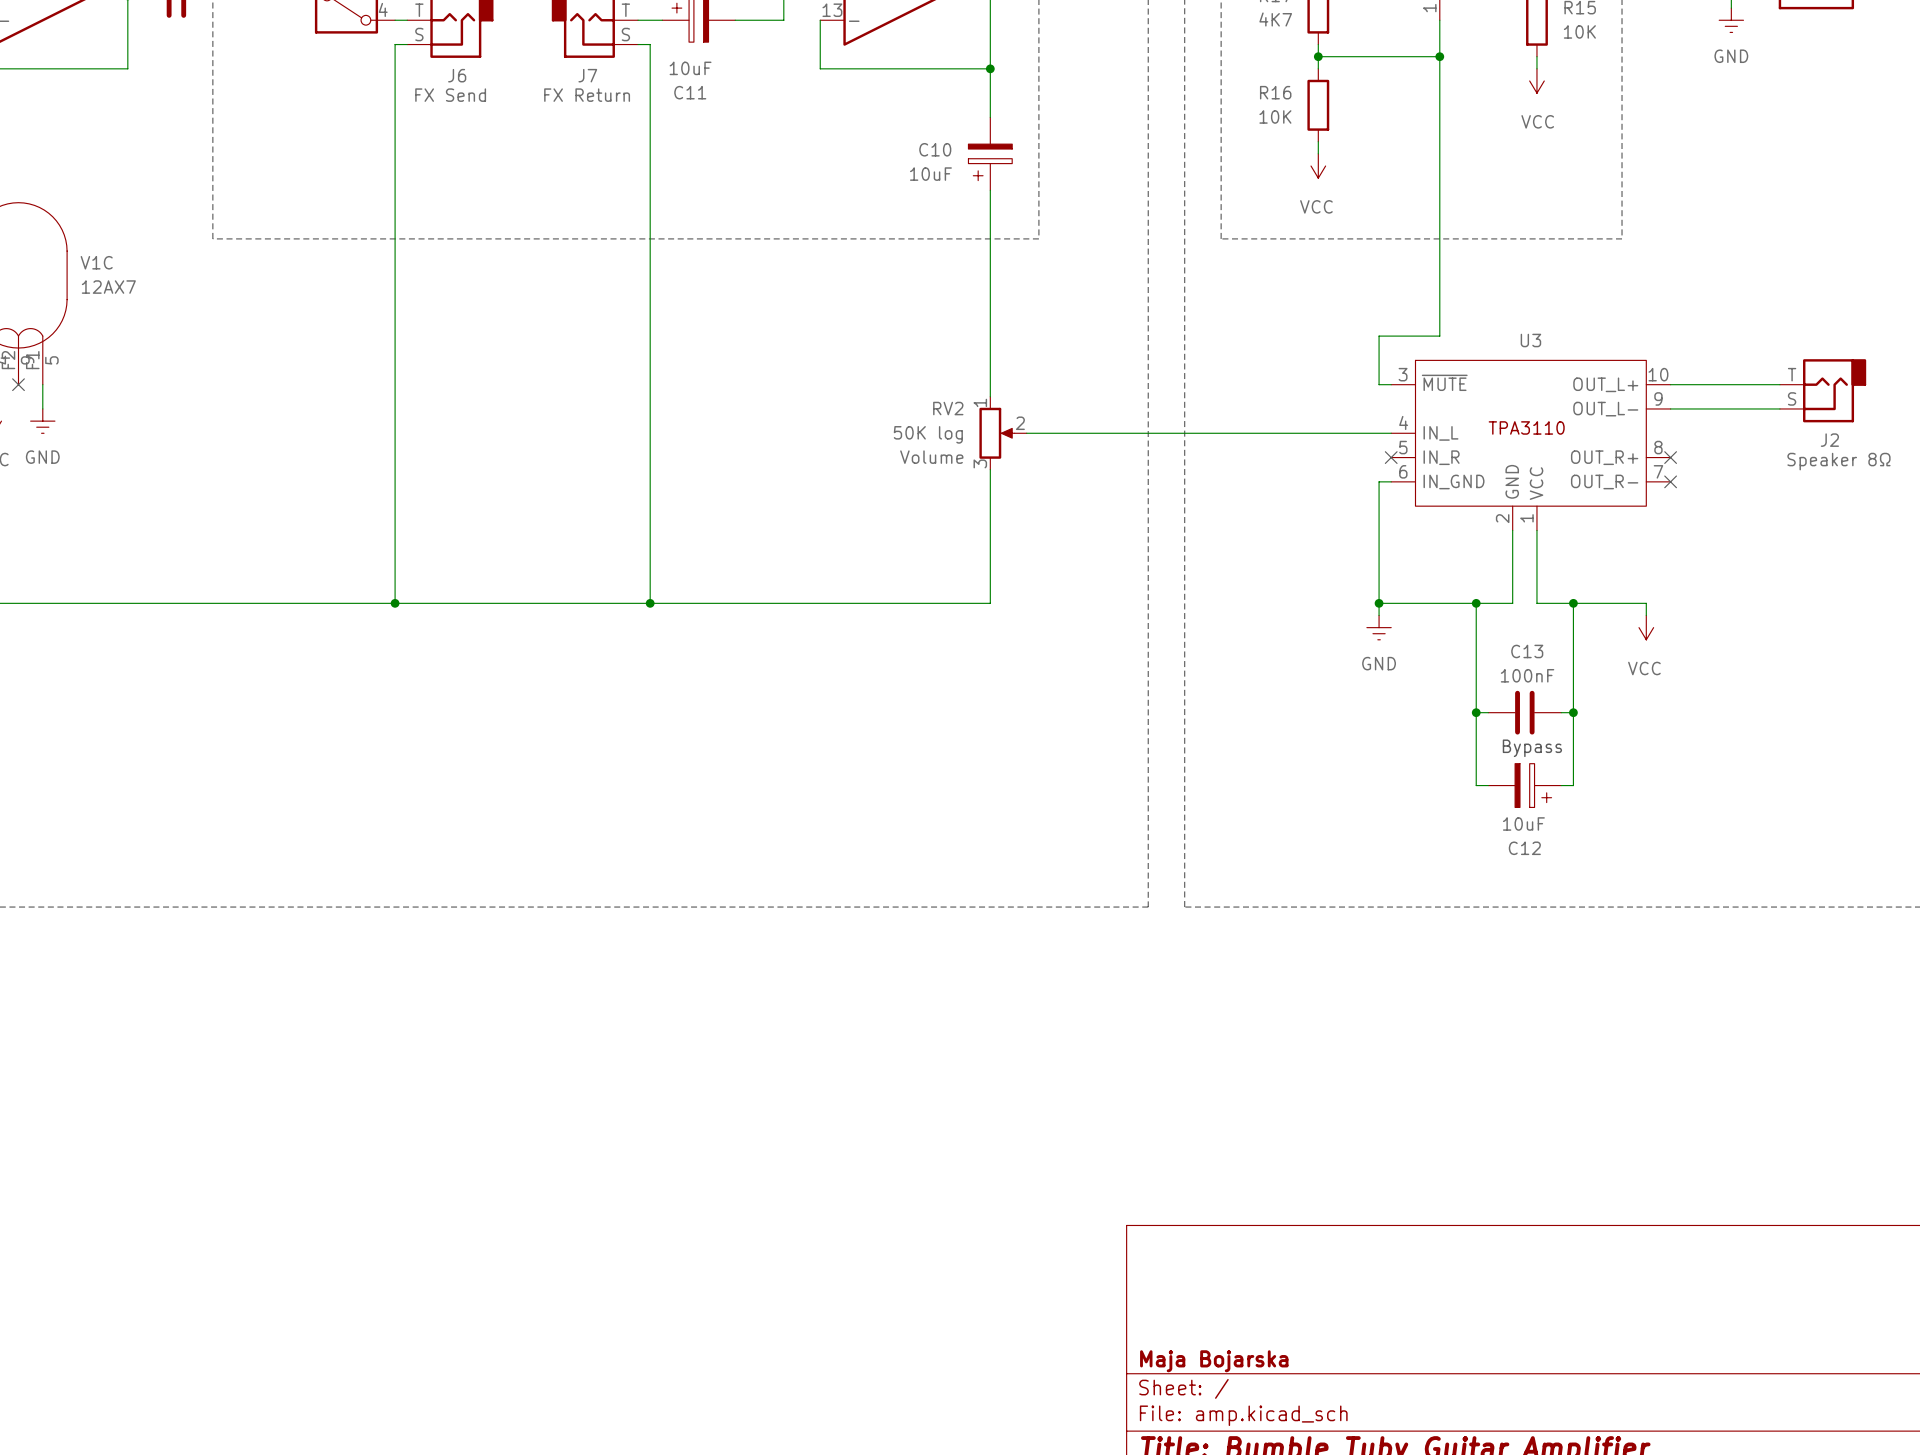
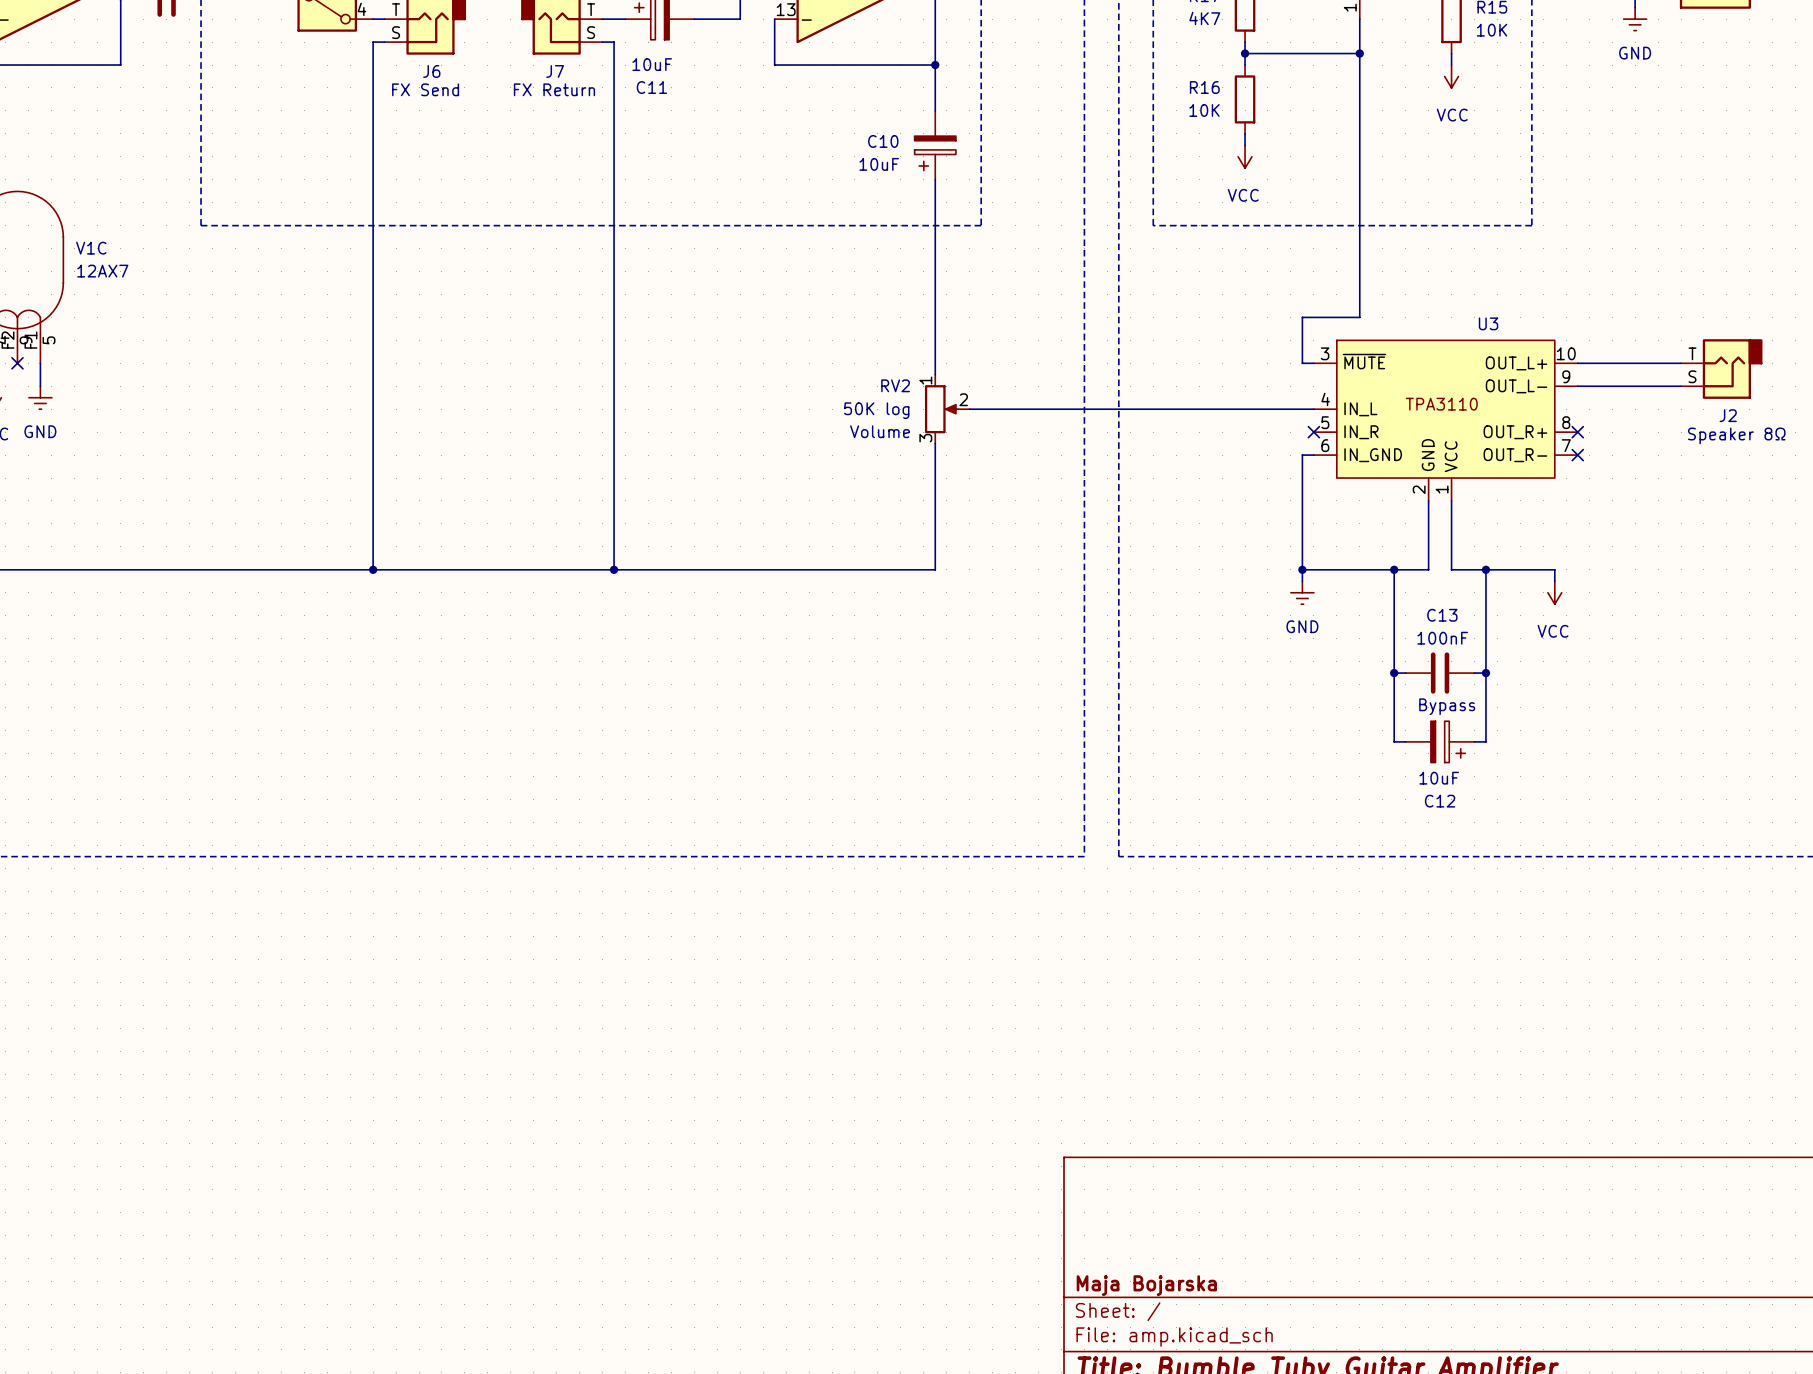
U3 name position: U3 (1530, 340) -> U3 (1488, 323)

